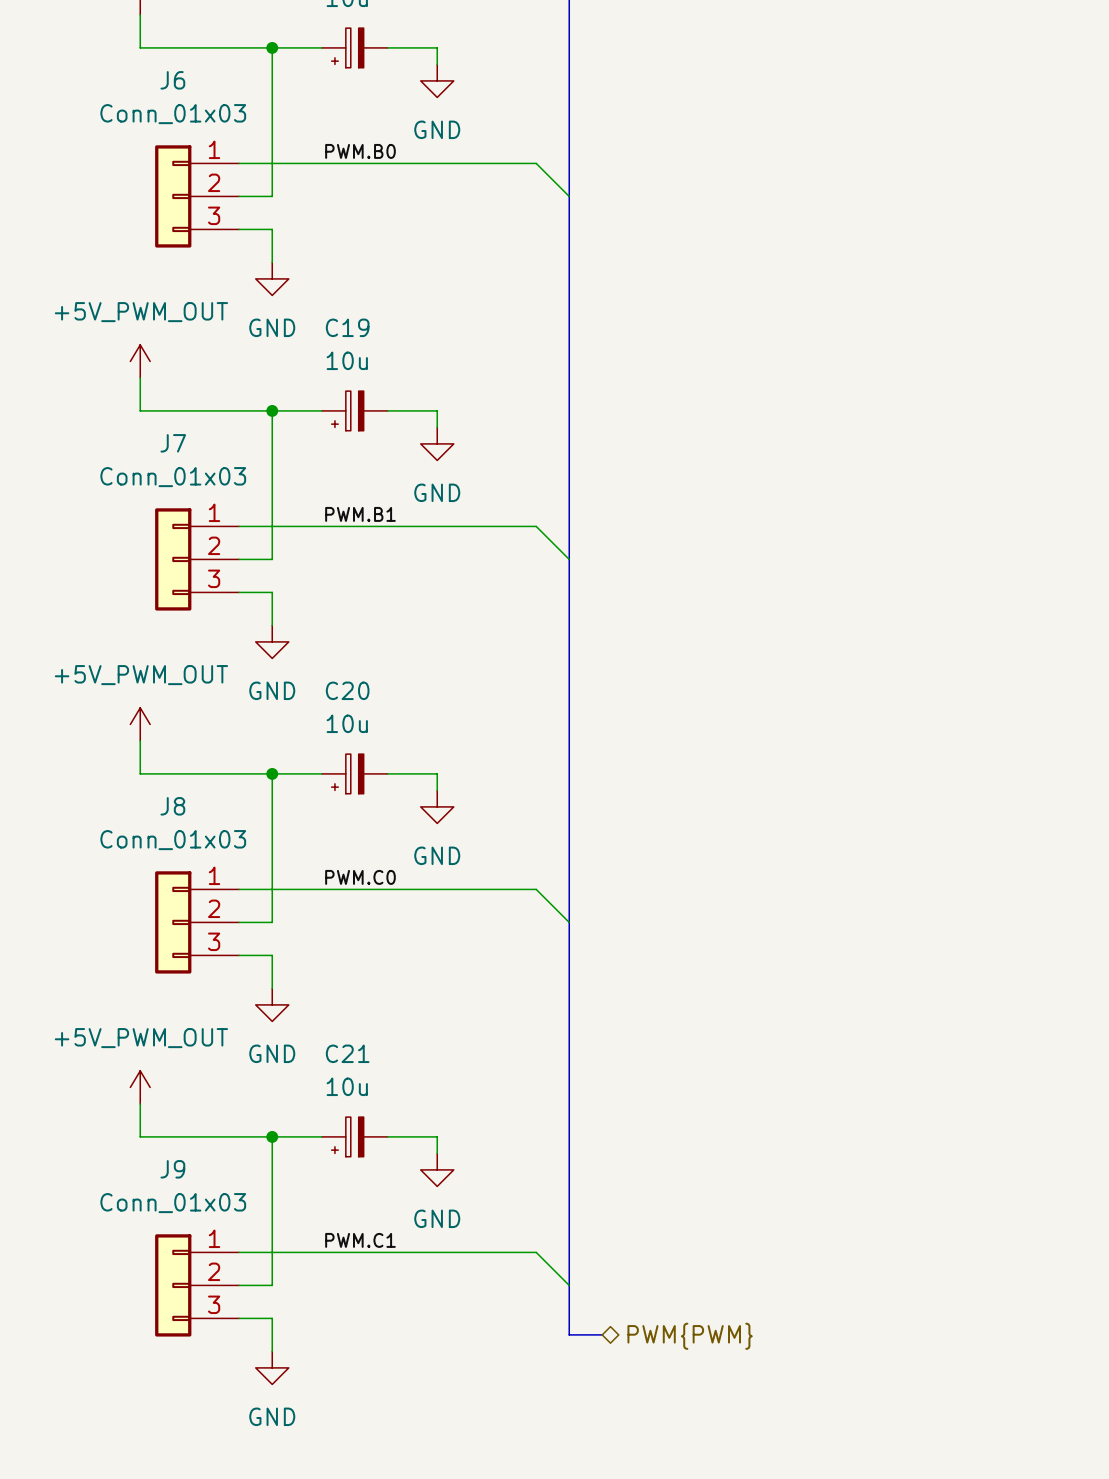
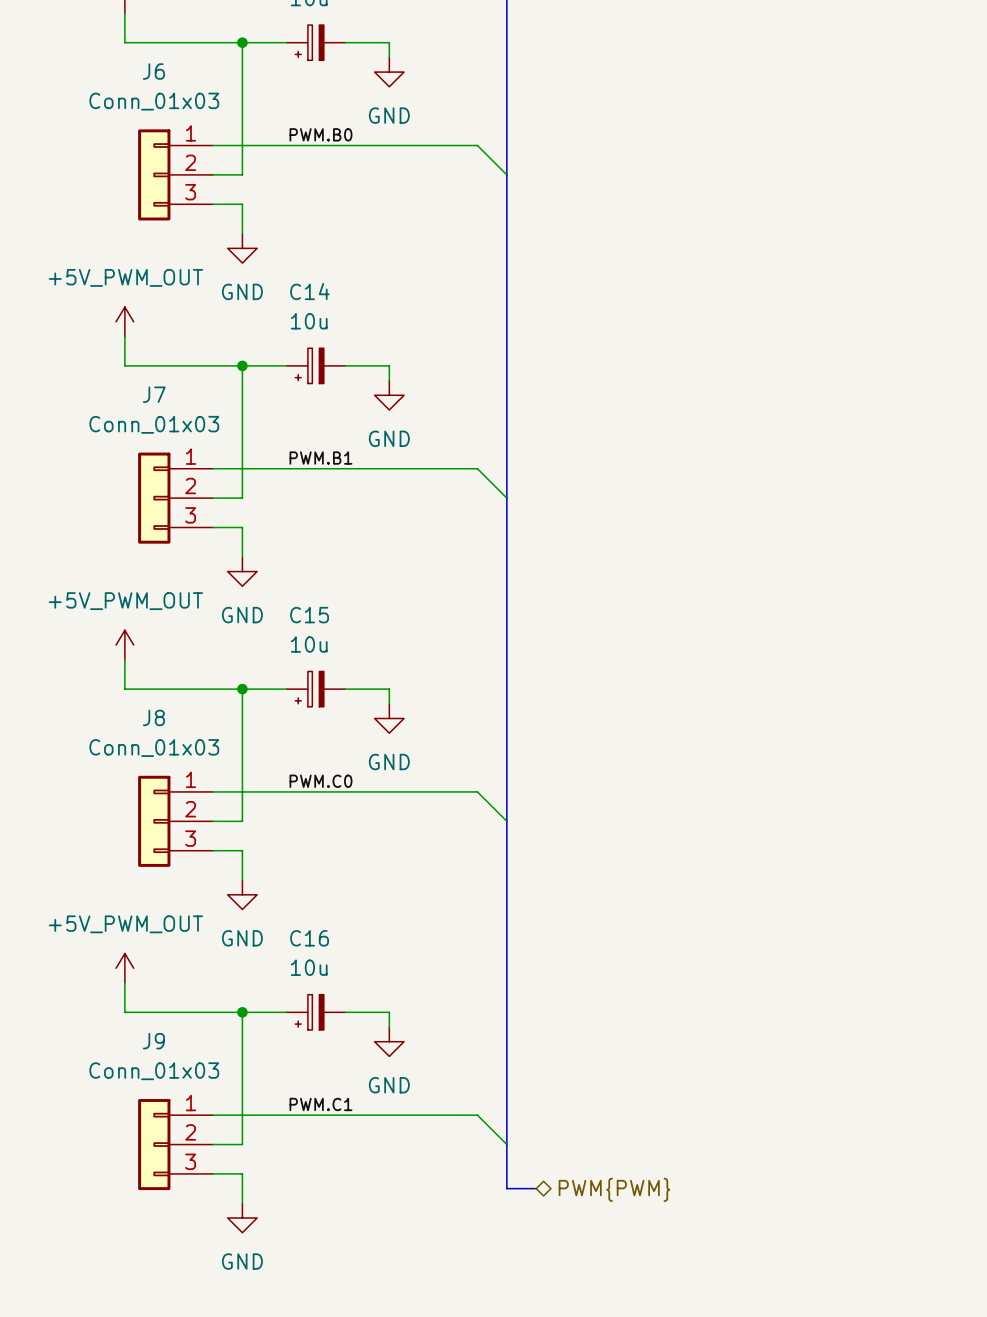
C19 name: C19 (347, 327) -> C14 (309, 291)
C20 name: C20 (347, 690) -> C15 (309, 615)
C21 name: C21 (347, 1053) -> C16 (309, 938)

